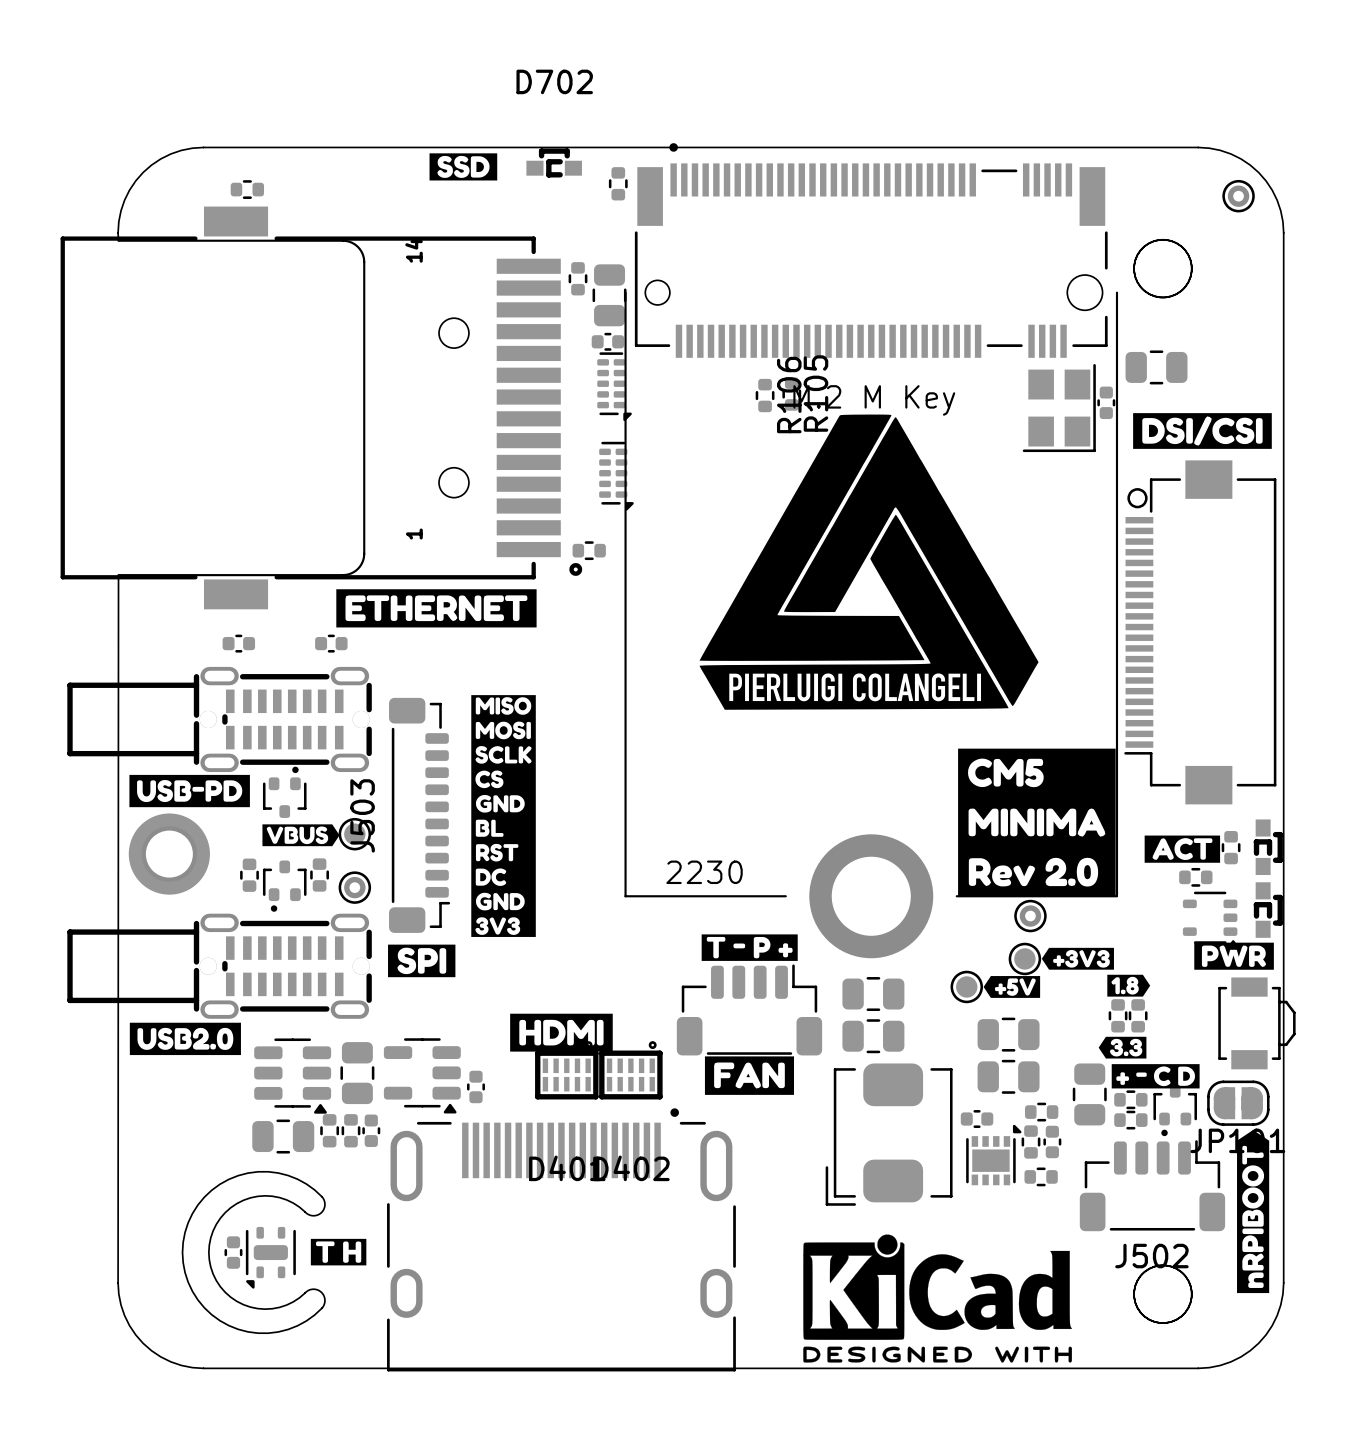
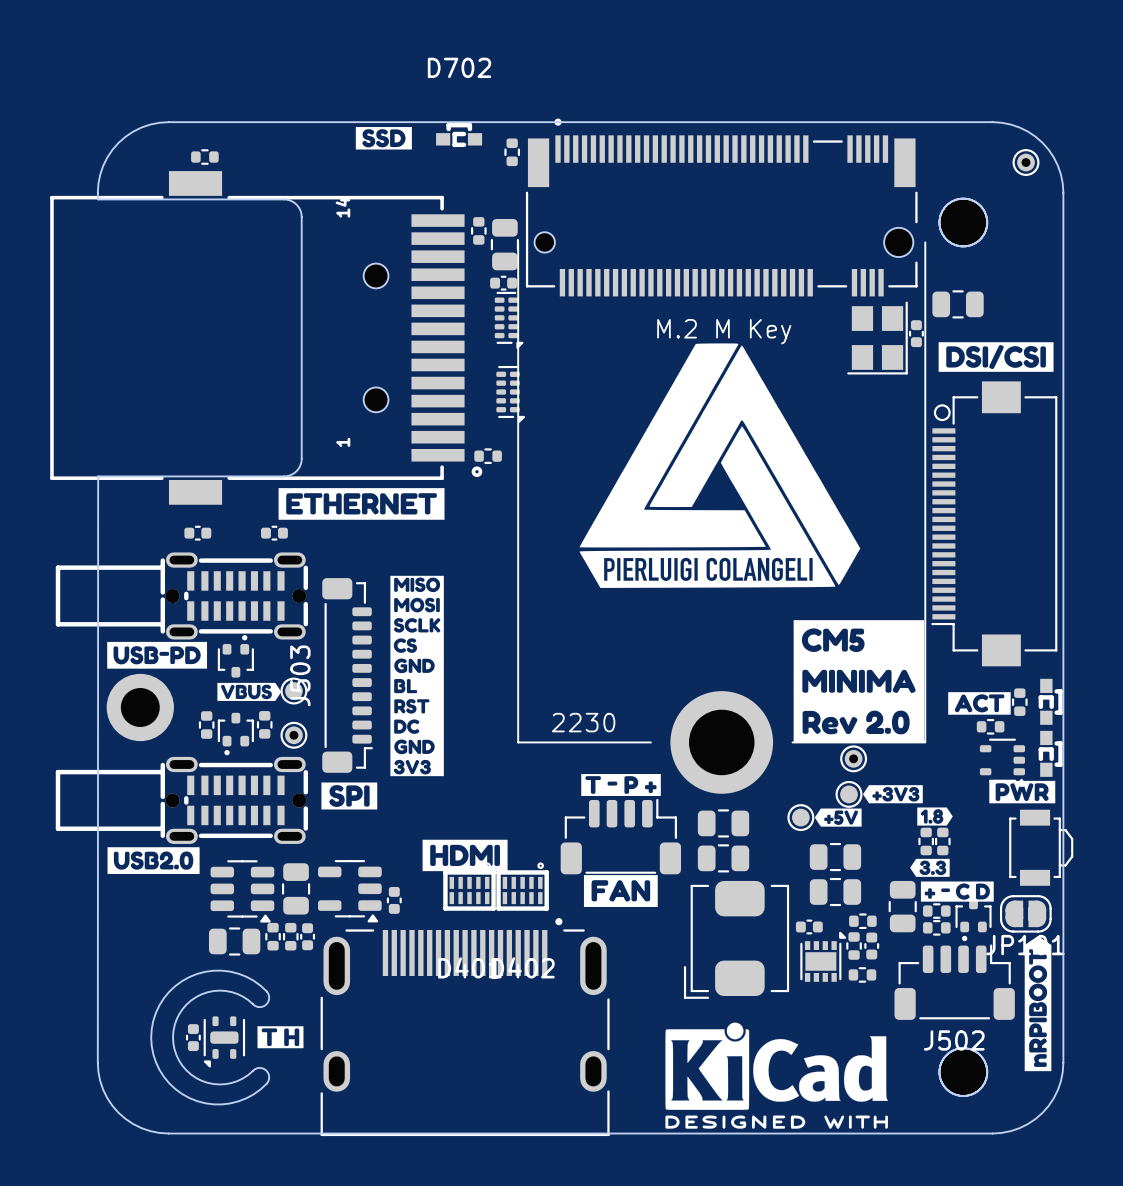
R105: (791, 394) -> none
R106: (765, 395) -> none

